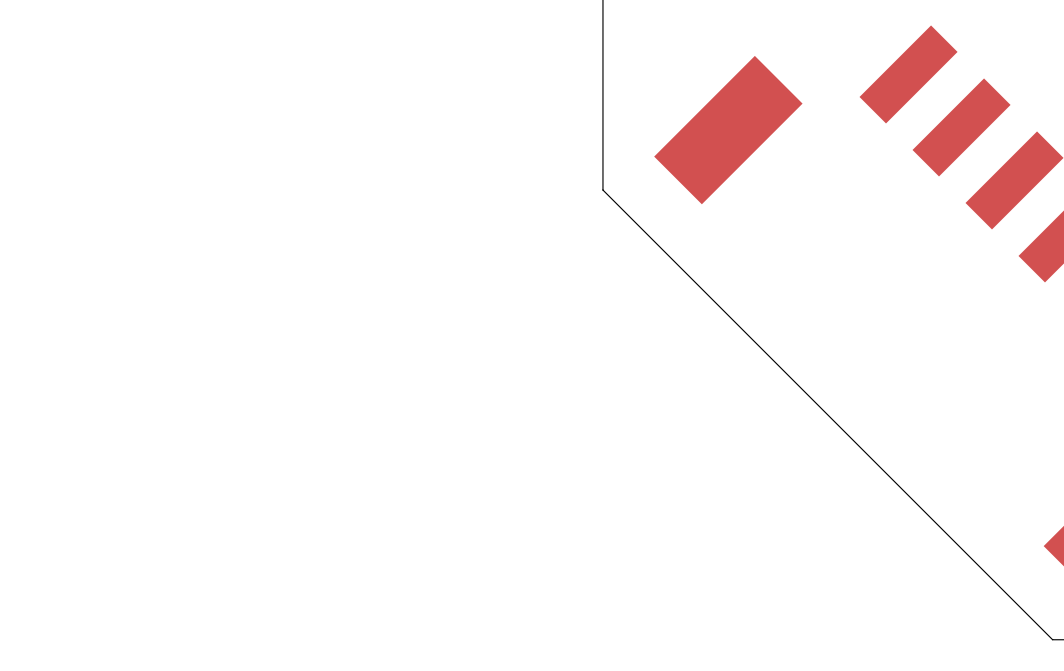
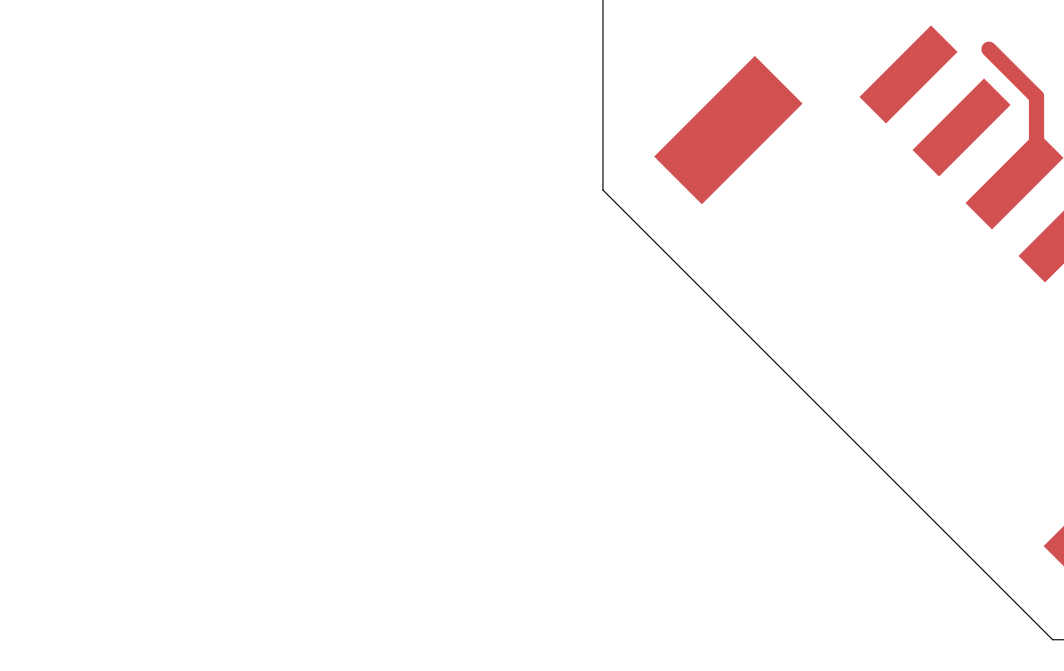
top track: none -> (988, 49) (1036, 96) (1036, 157)

